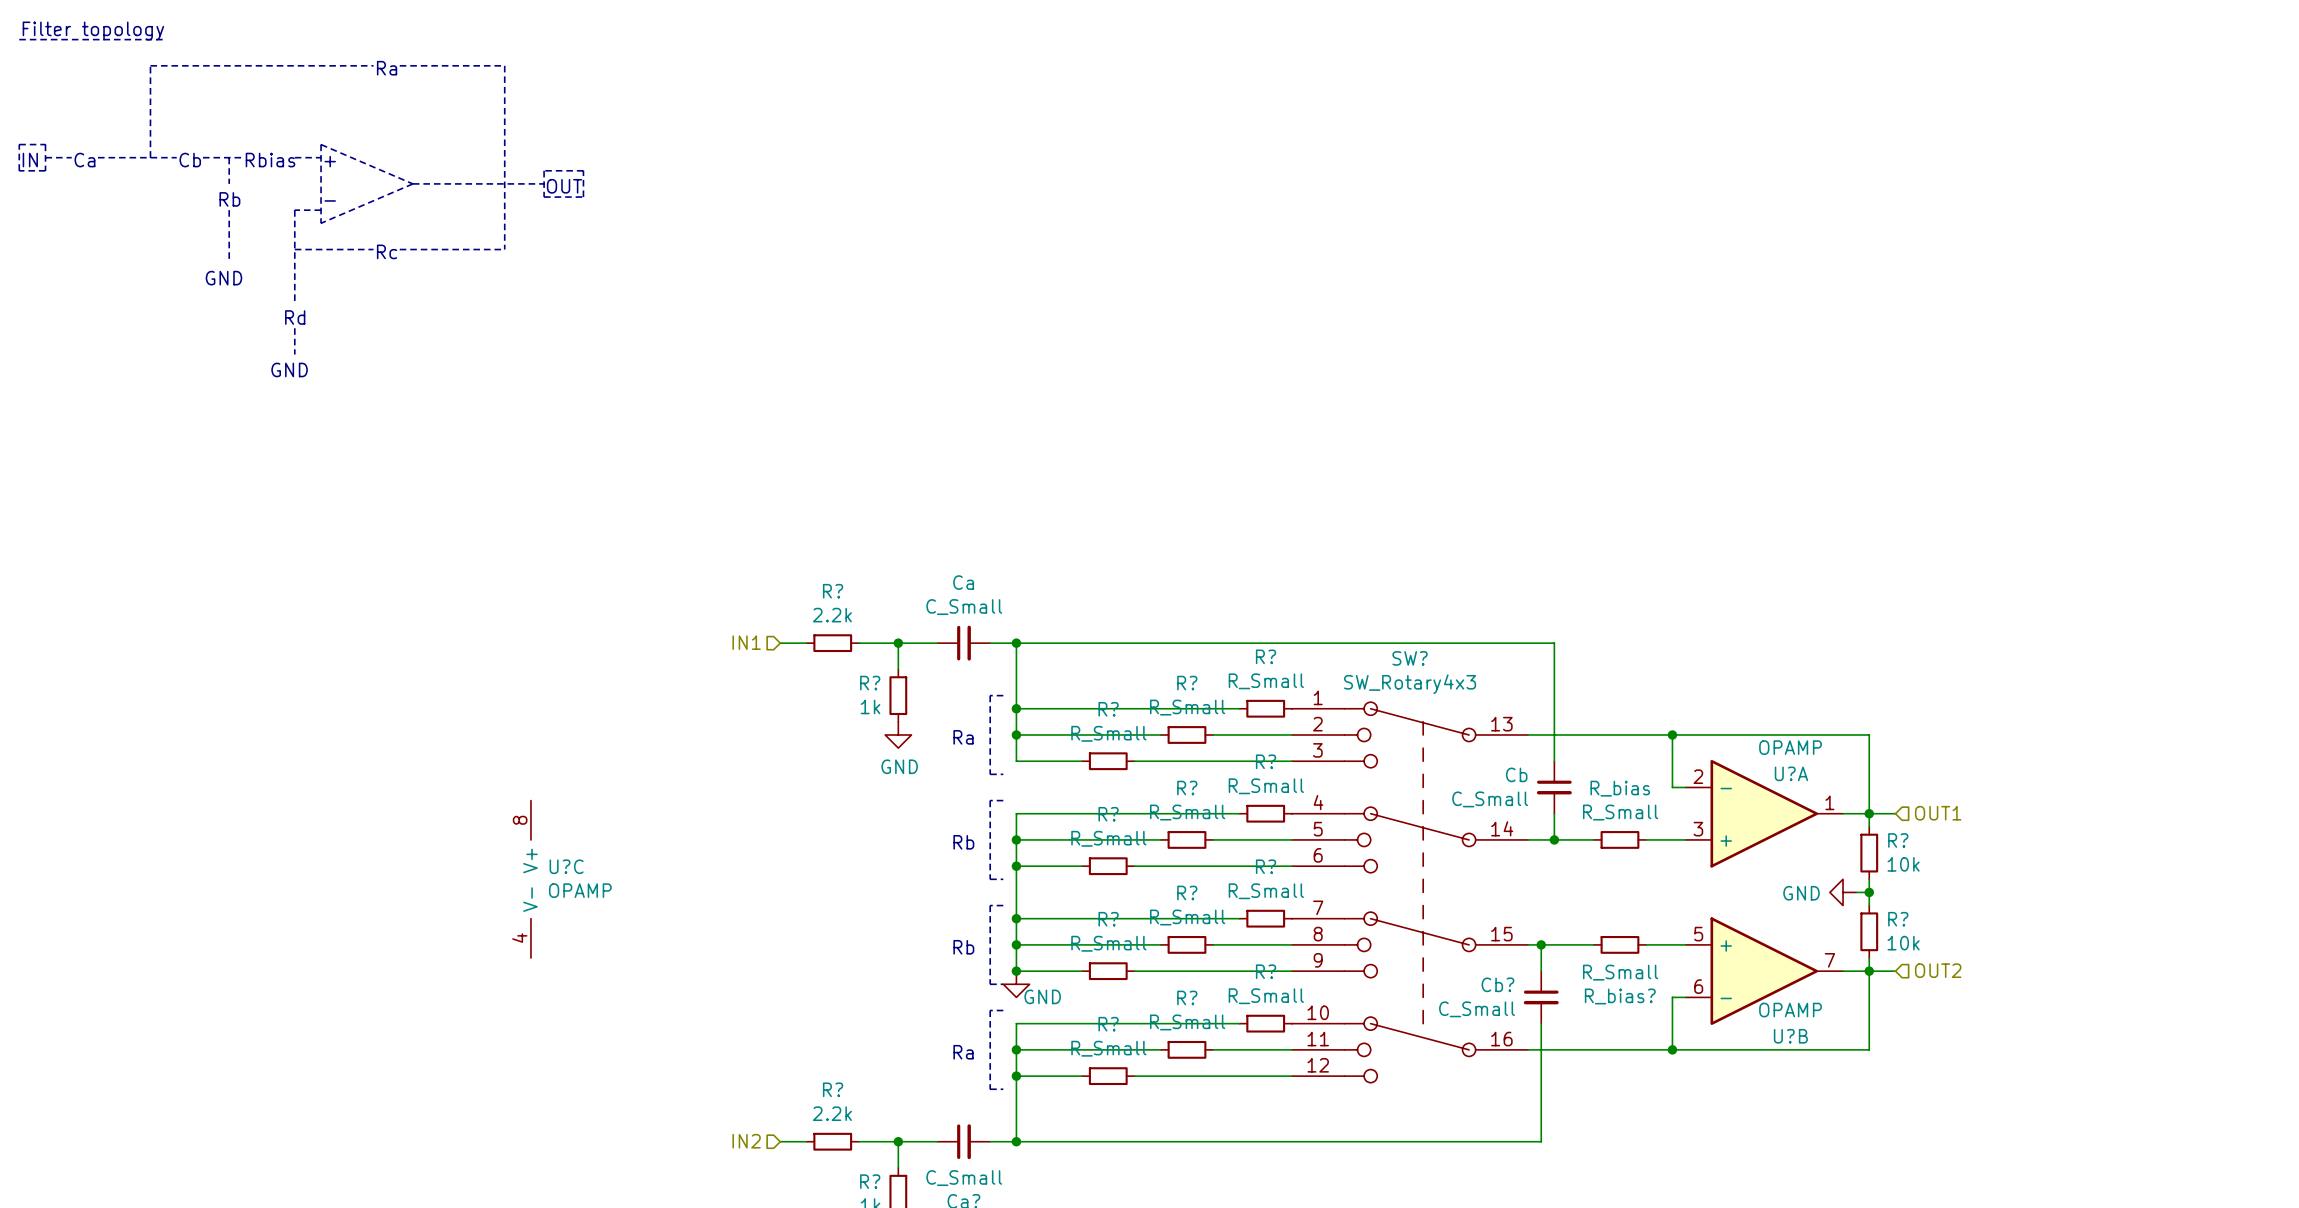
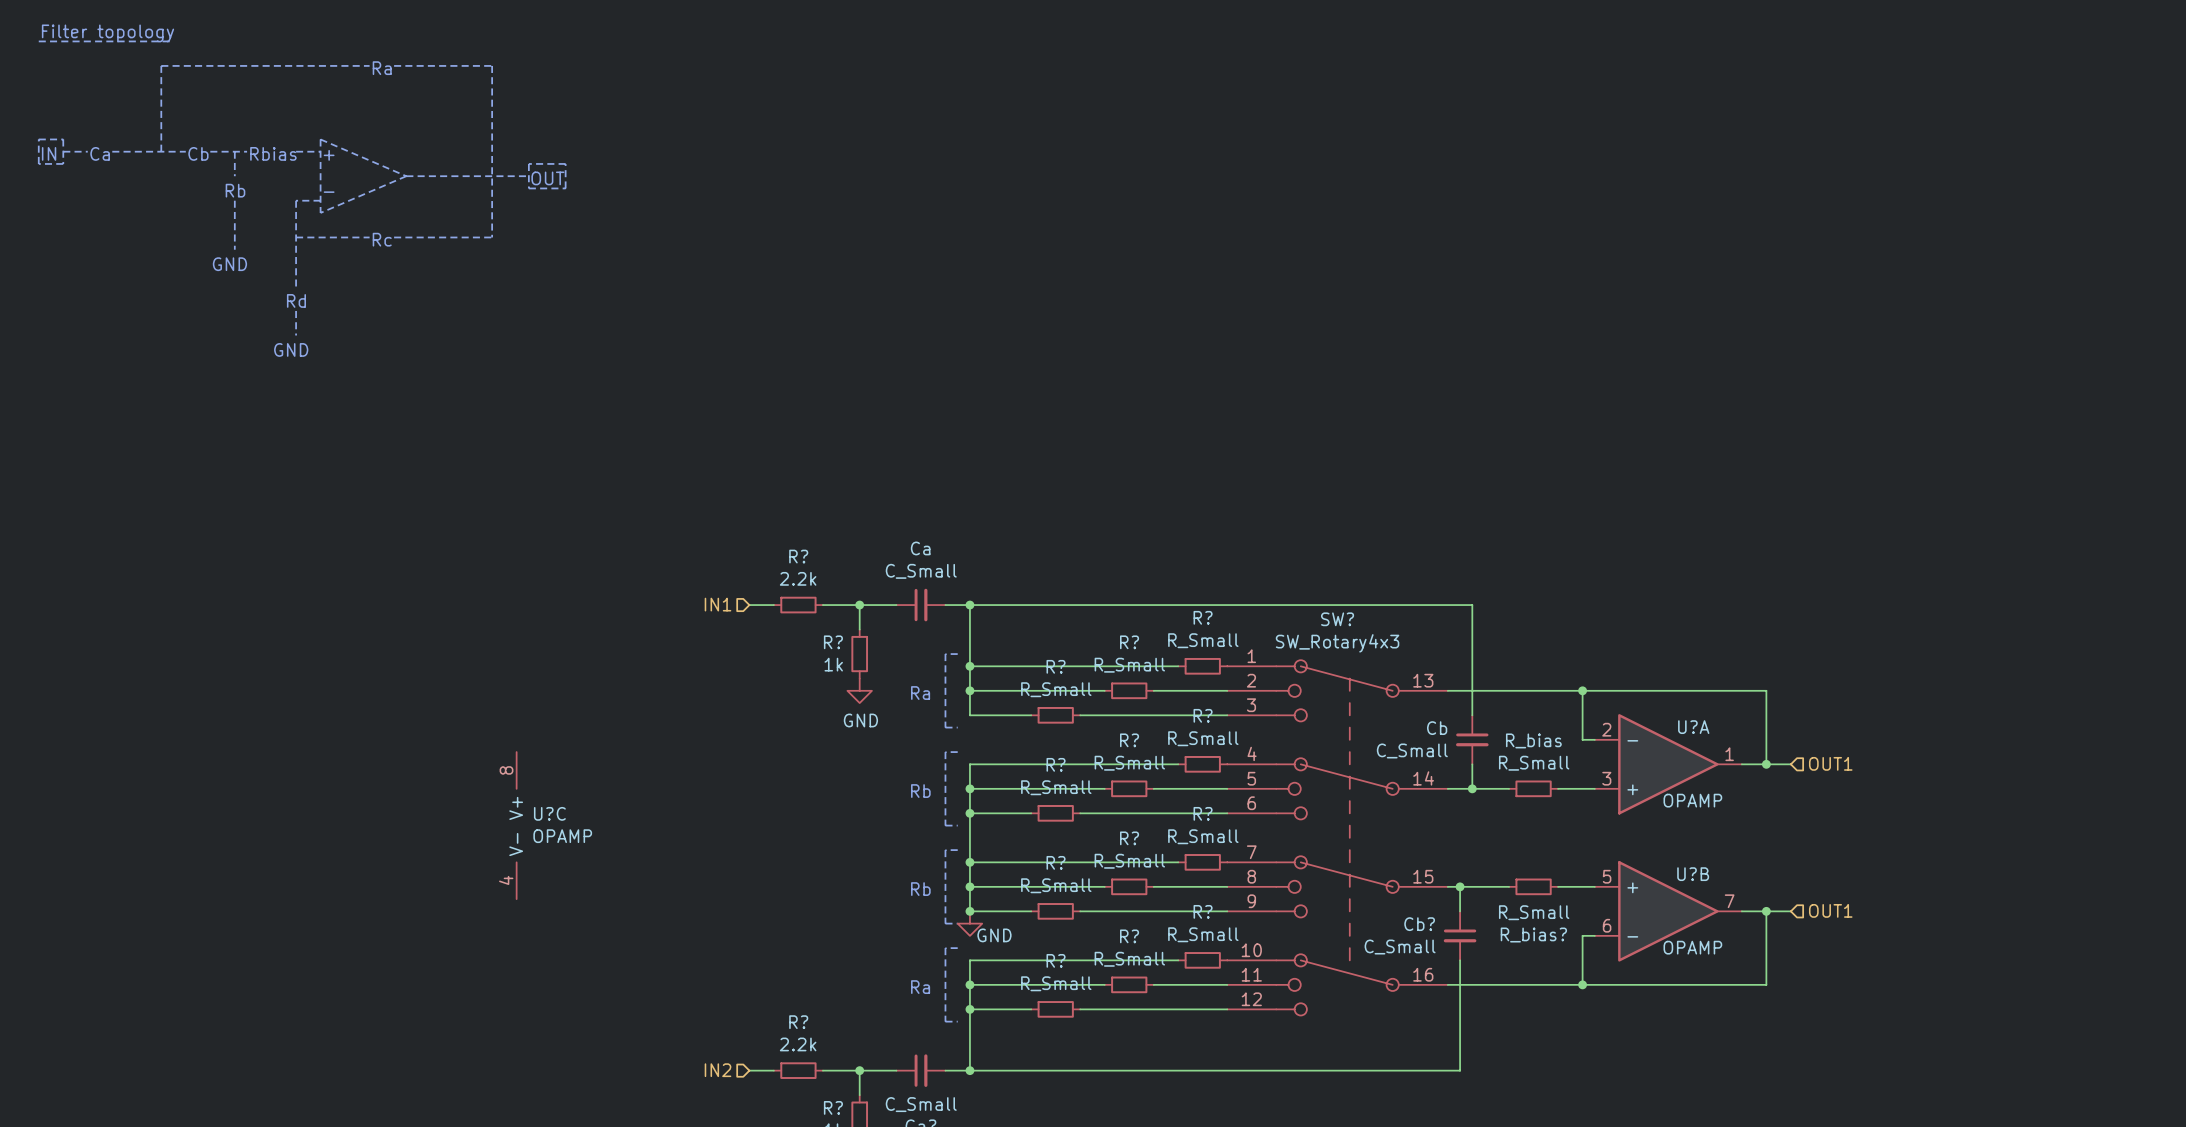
U?A value position: OPAMP (1790, 747) -> OPAMP (1692, 800)
wire: (1869, 813) (1869, 826) -> none
R?: 10k (1869, 853) -> none
wire: (1869, 879) (1869, 905) -> none
power symbol: GND (1843, 892) -> none
wire: (1856, 892) (1869, 892) -> none
junction: (1869, 892) -> none
R?: 10k (1869, 931) -> none
wire: (1869, 958) (1869, 971) -> none
hierarchical label: OUT2 (1938, 970) -> OUT1 (1830, 910)
U?B name position: U?B (1790, 1036) -> U?B (1693, 874)

